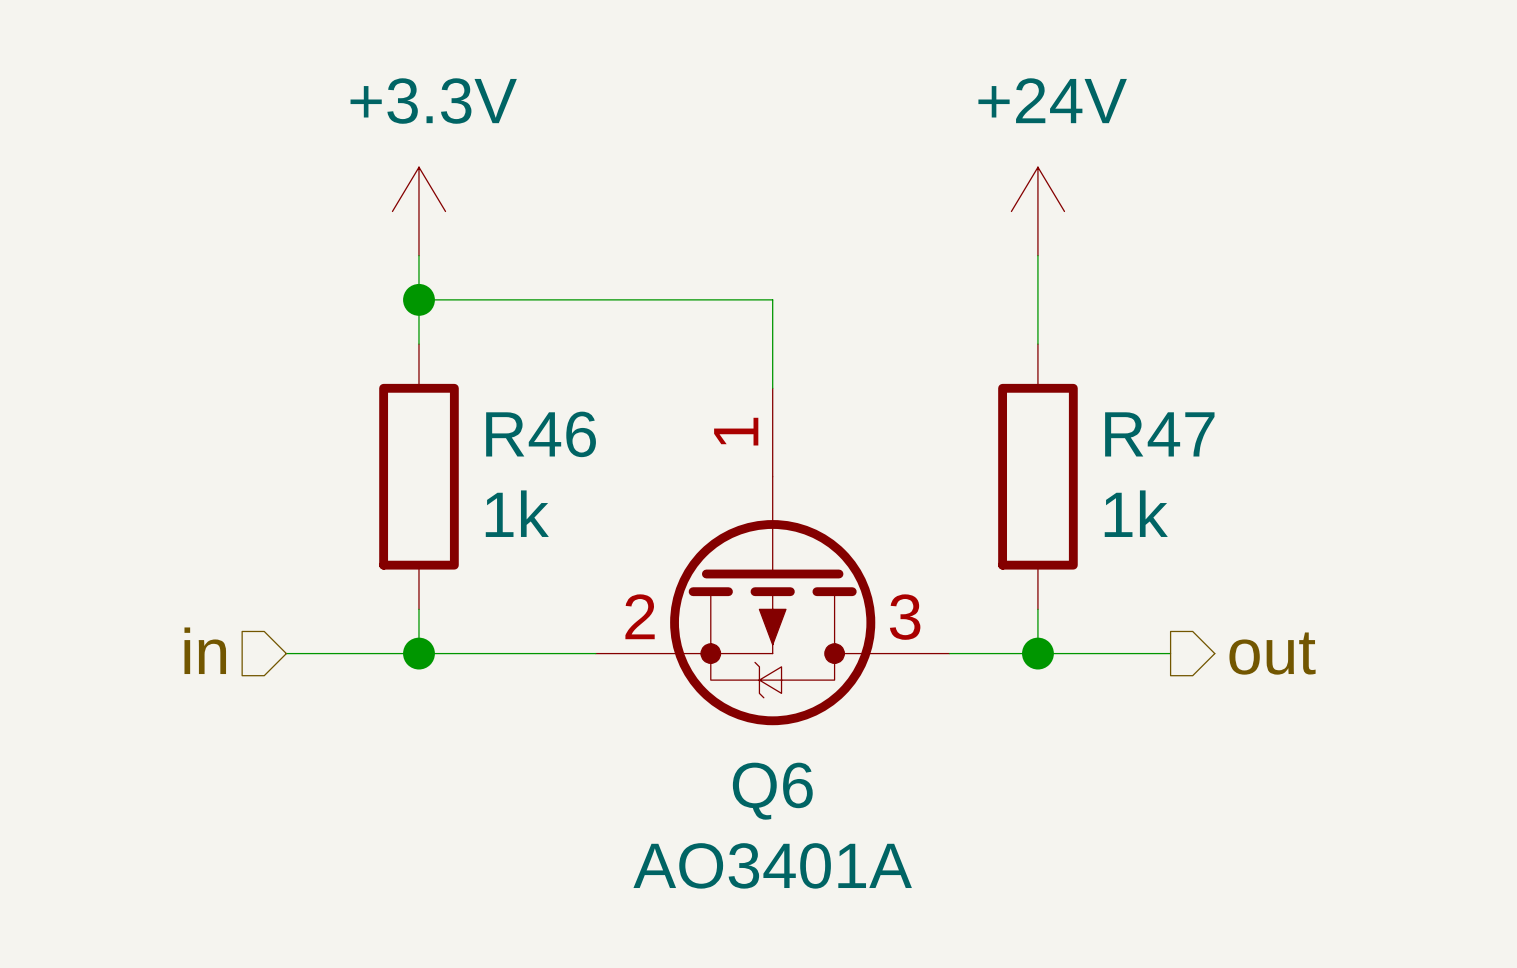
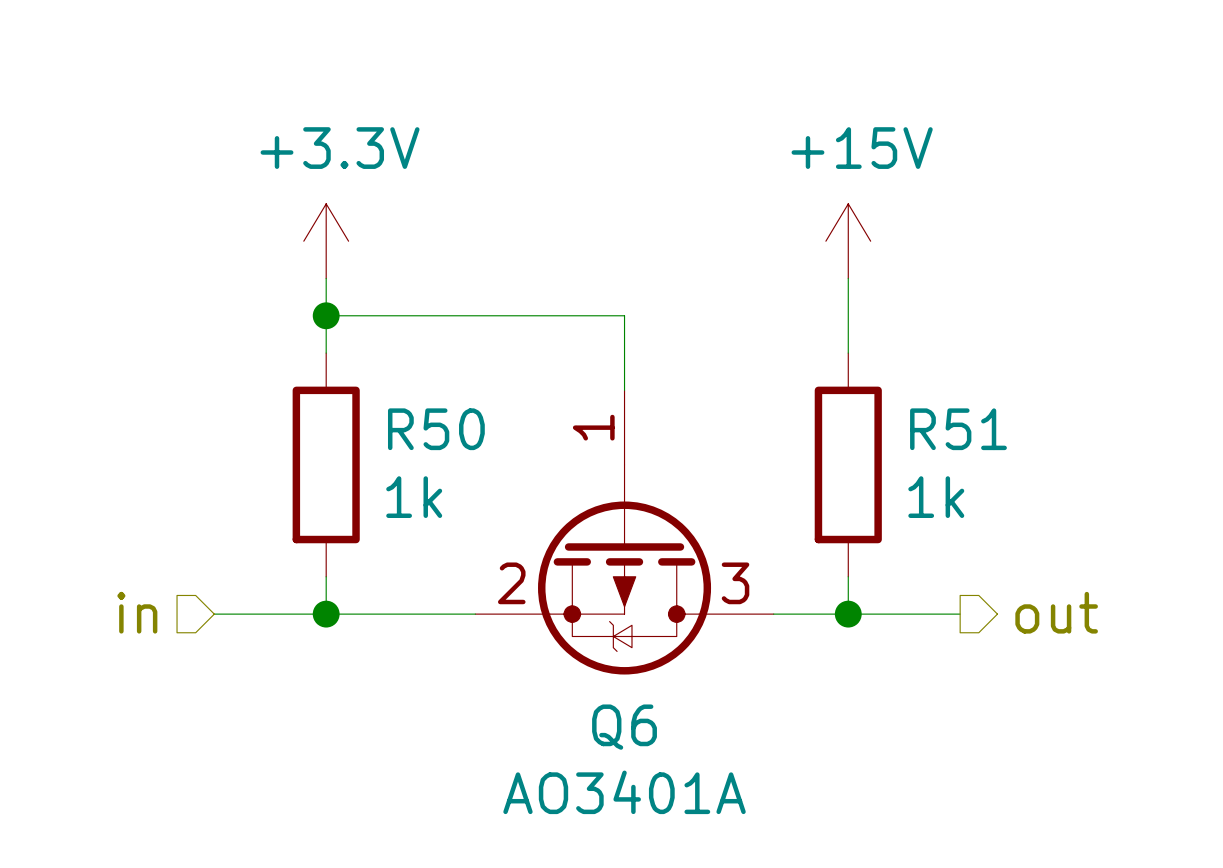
power symbol: +24V (1037, 211) -> +15V (848, 241)
R46 name: R46 (541, 434) -> R50 (436, 429)
R47 name: R47 (1159, 434) -> R51 (958, 429)

